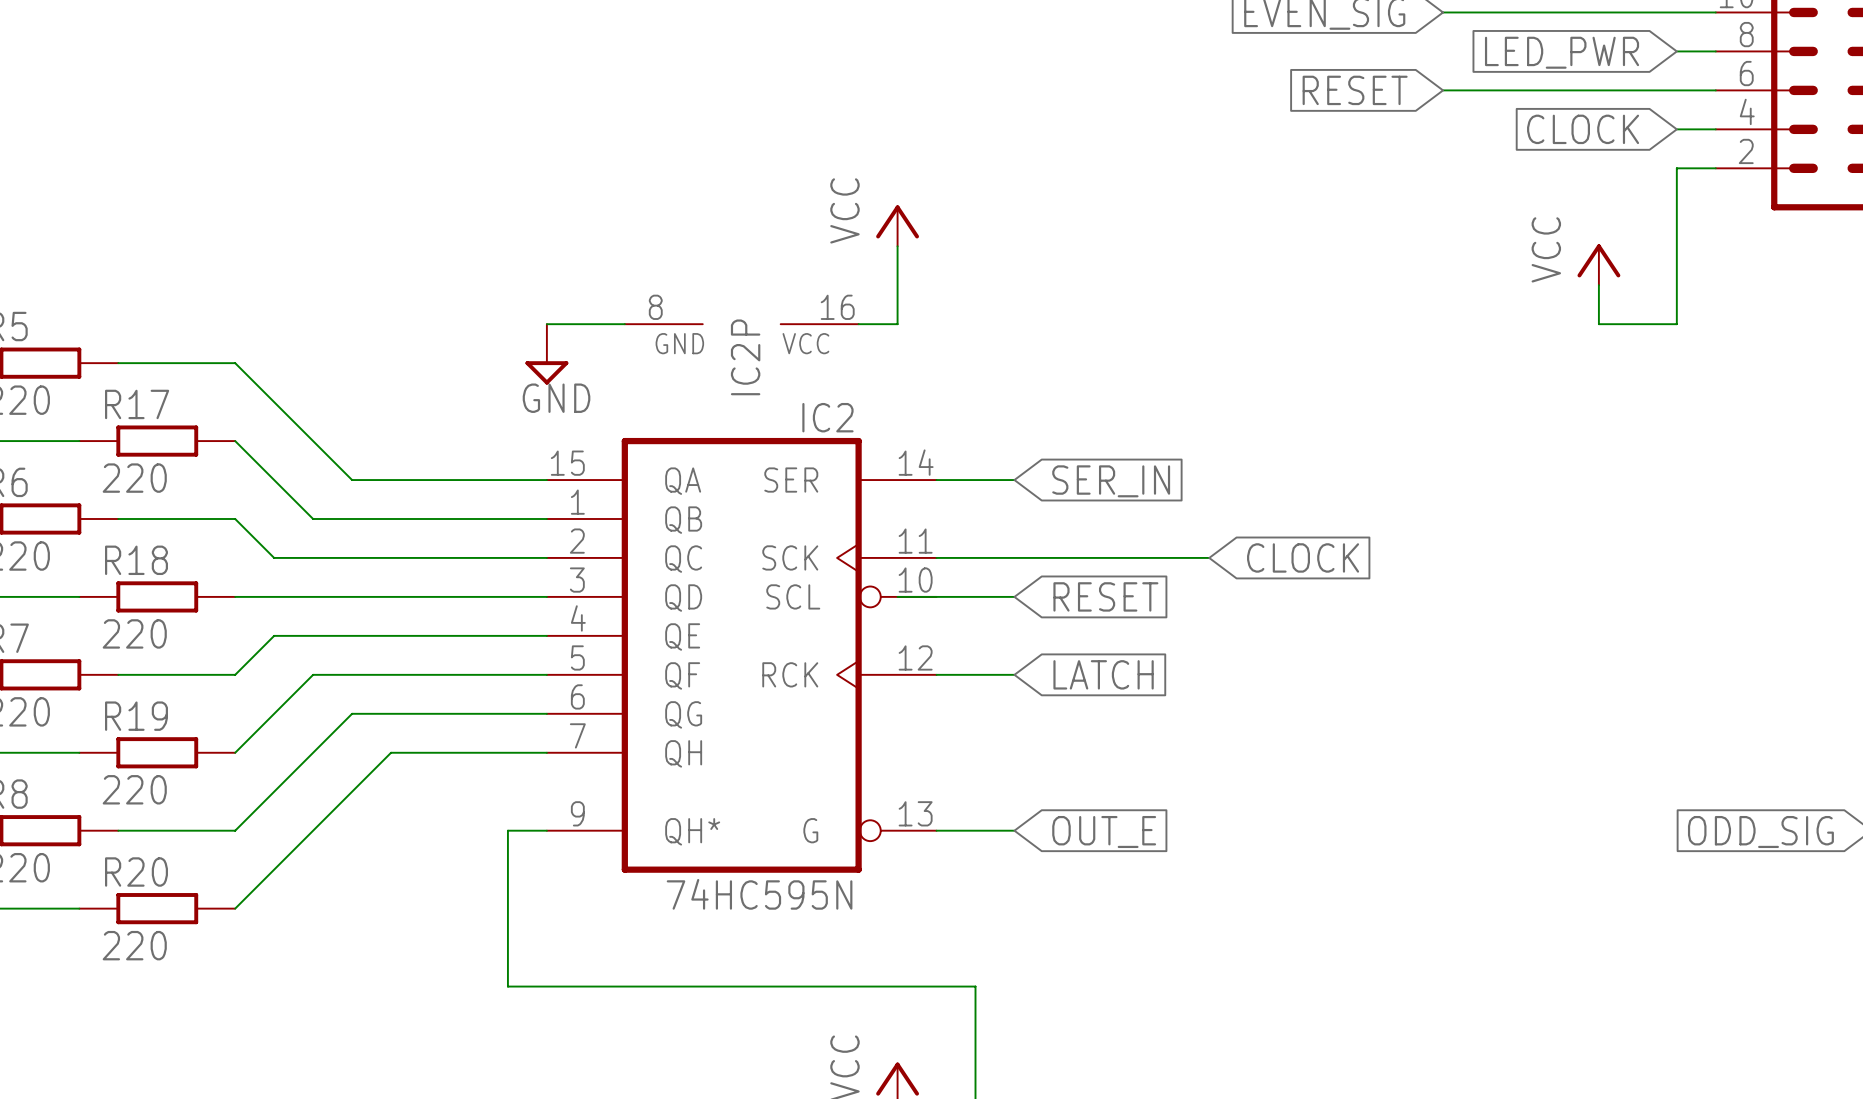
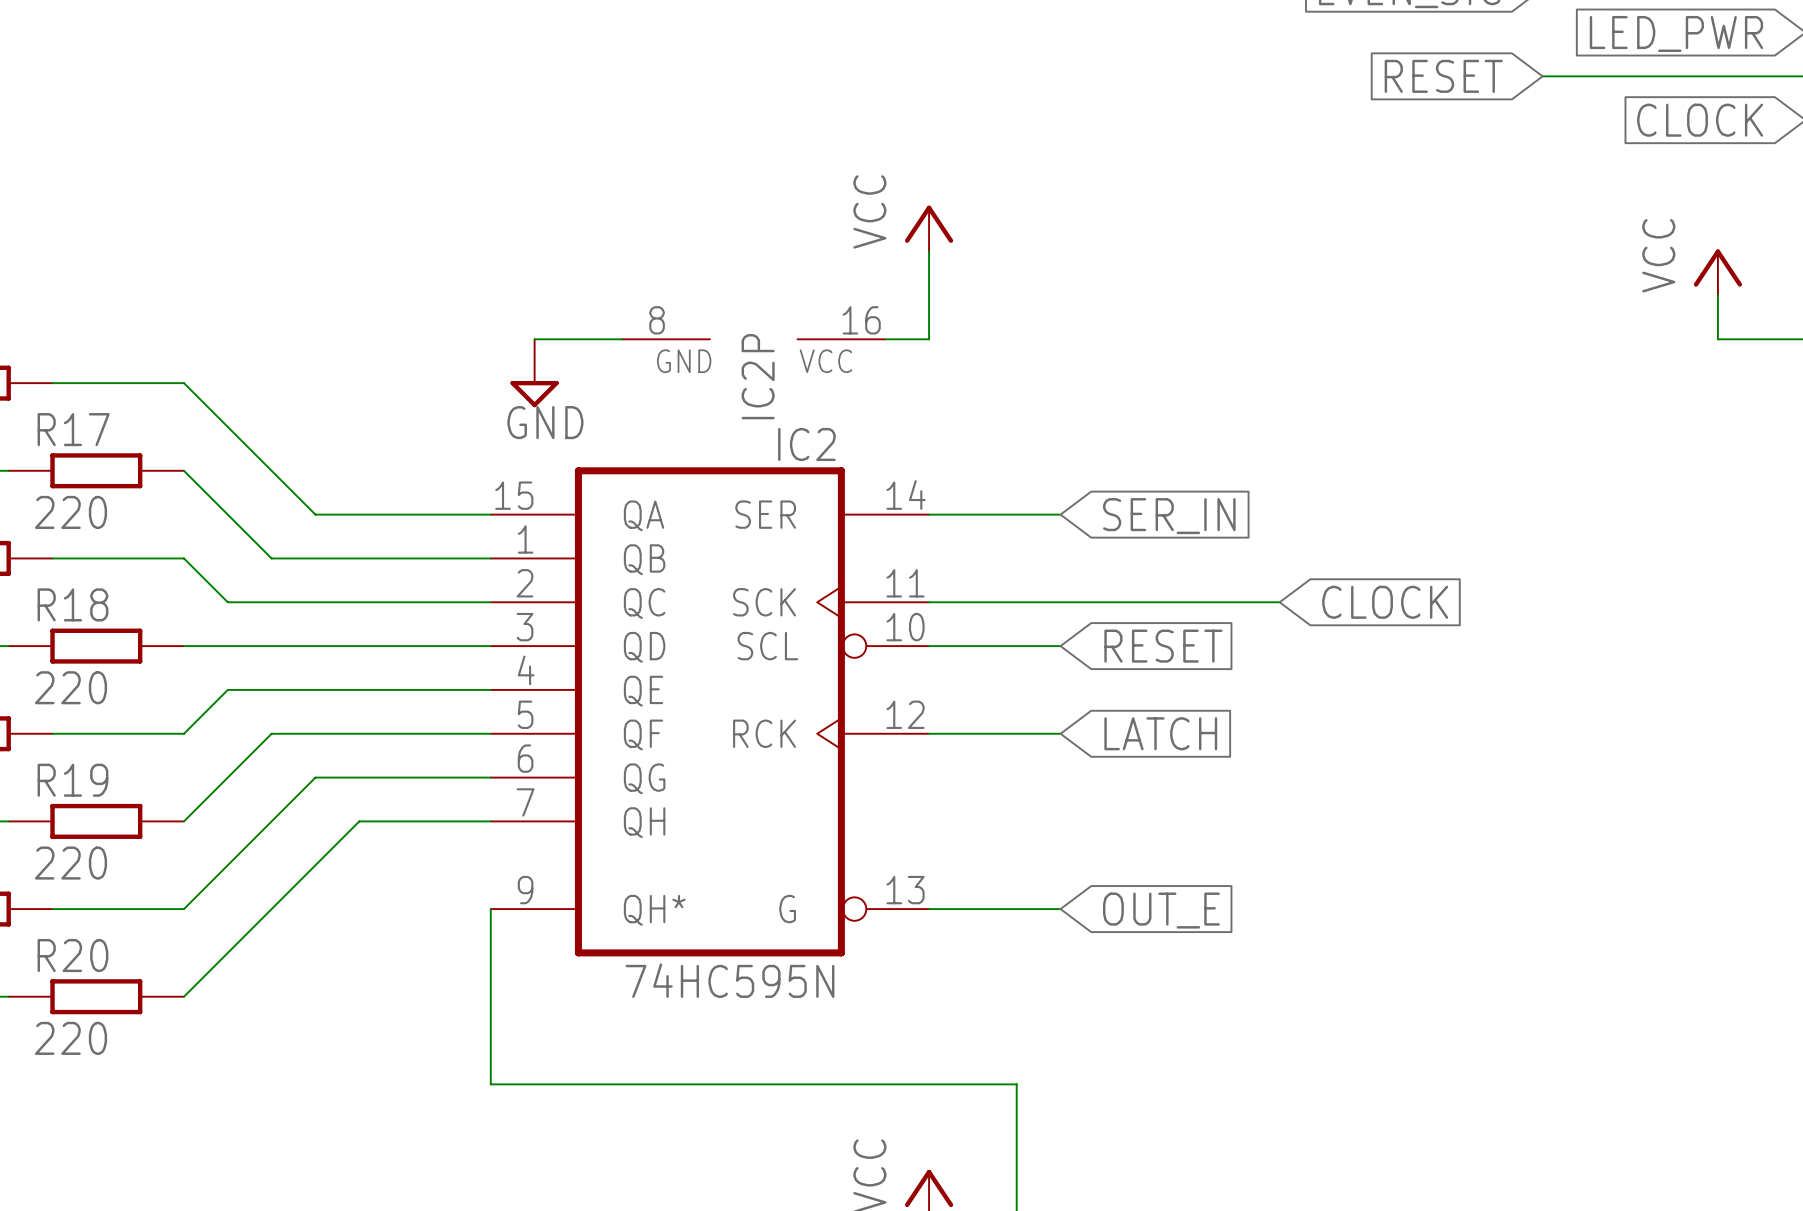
IC2 position: (741, 655) -> (709, 711)

